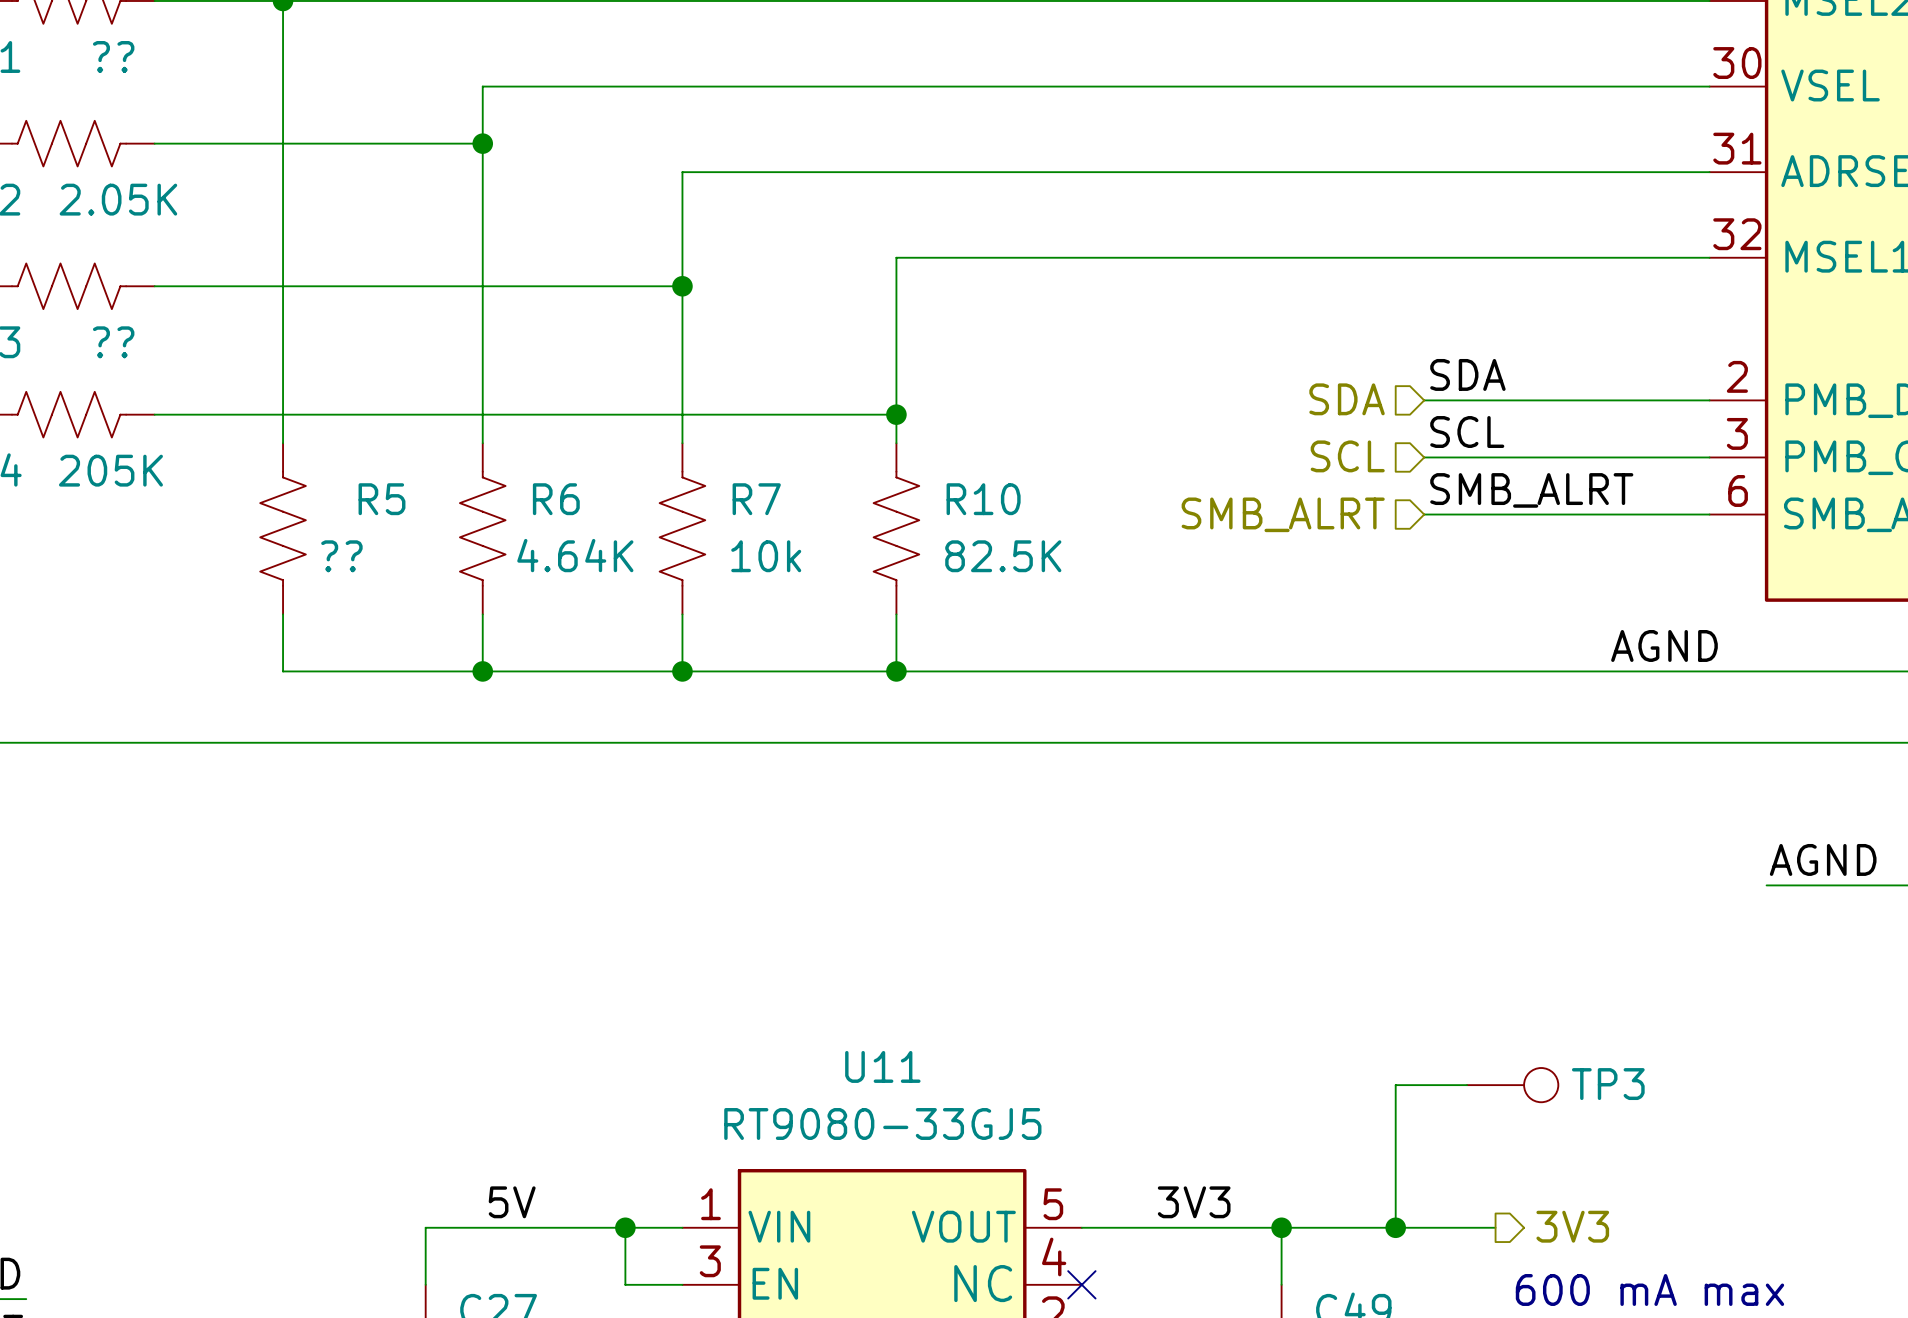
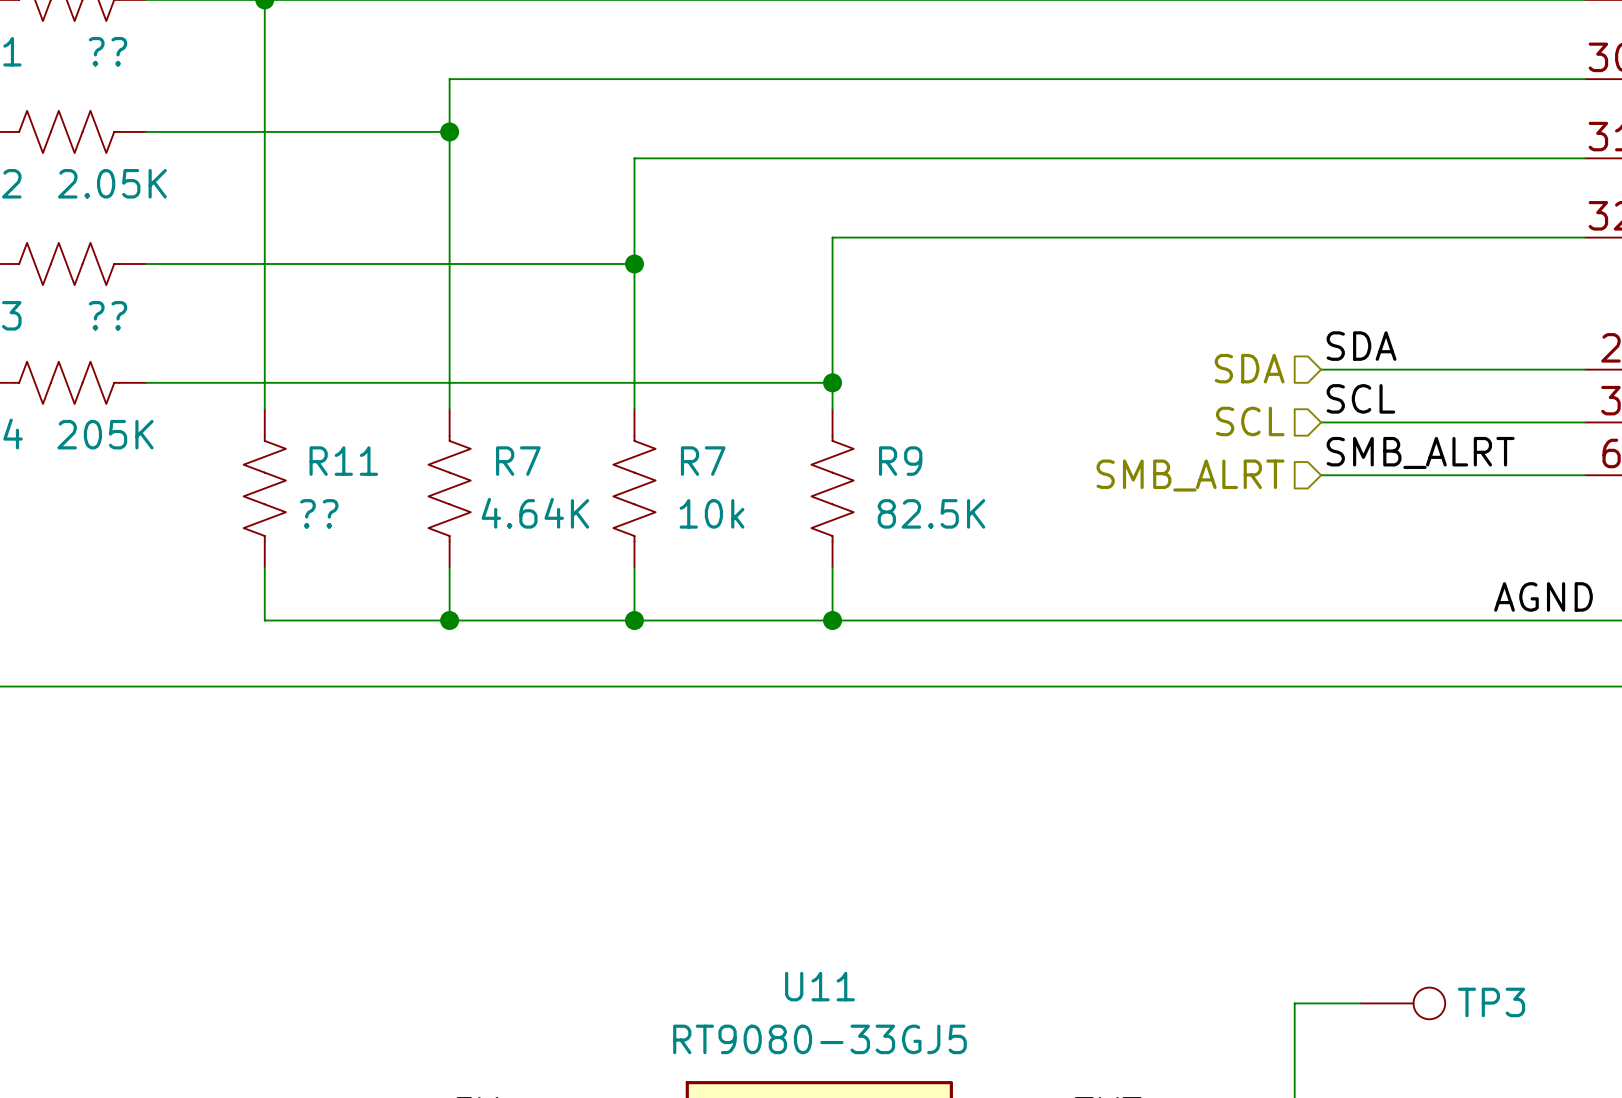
R5 name: R5 (381, 499) -> R11 (343, 461)
R6 name: R6 (556, 499) -> R7 (518, 461)
R10 name: R10 (983, 499) -> R9 (900, 461)

